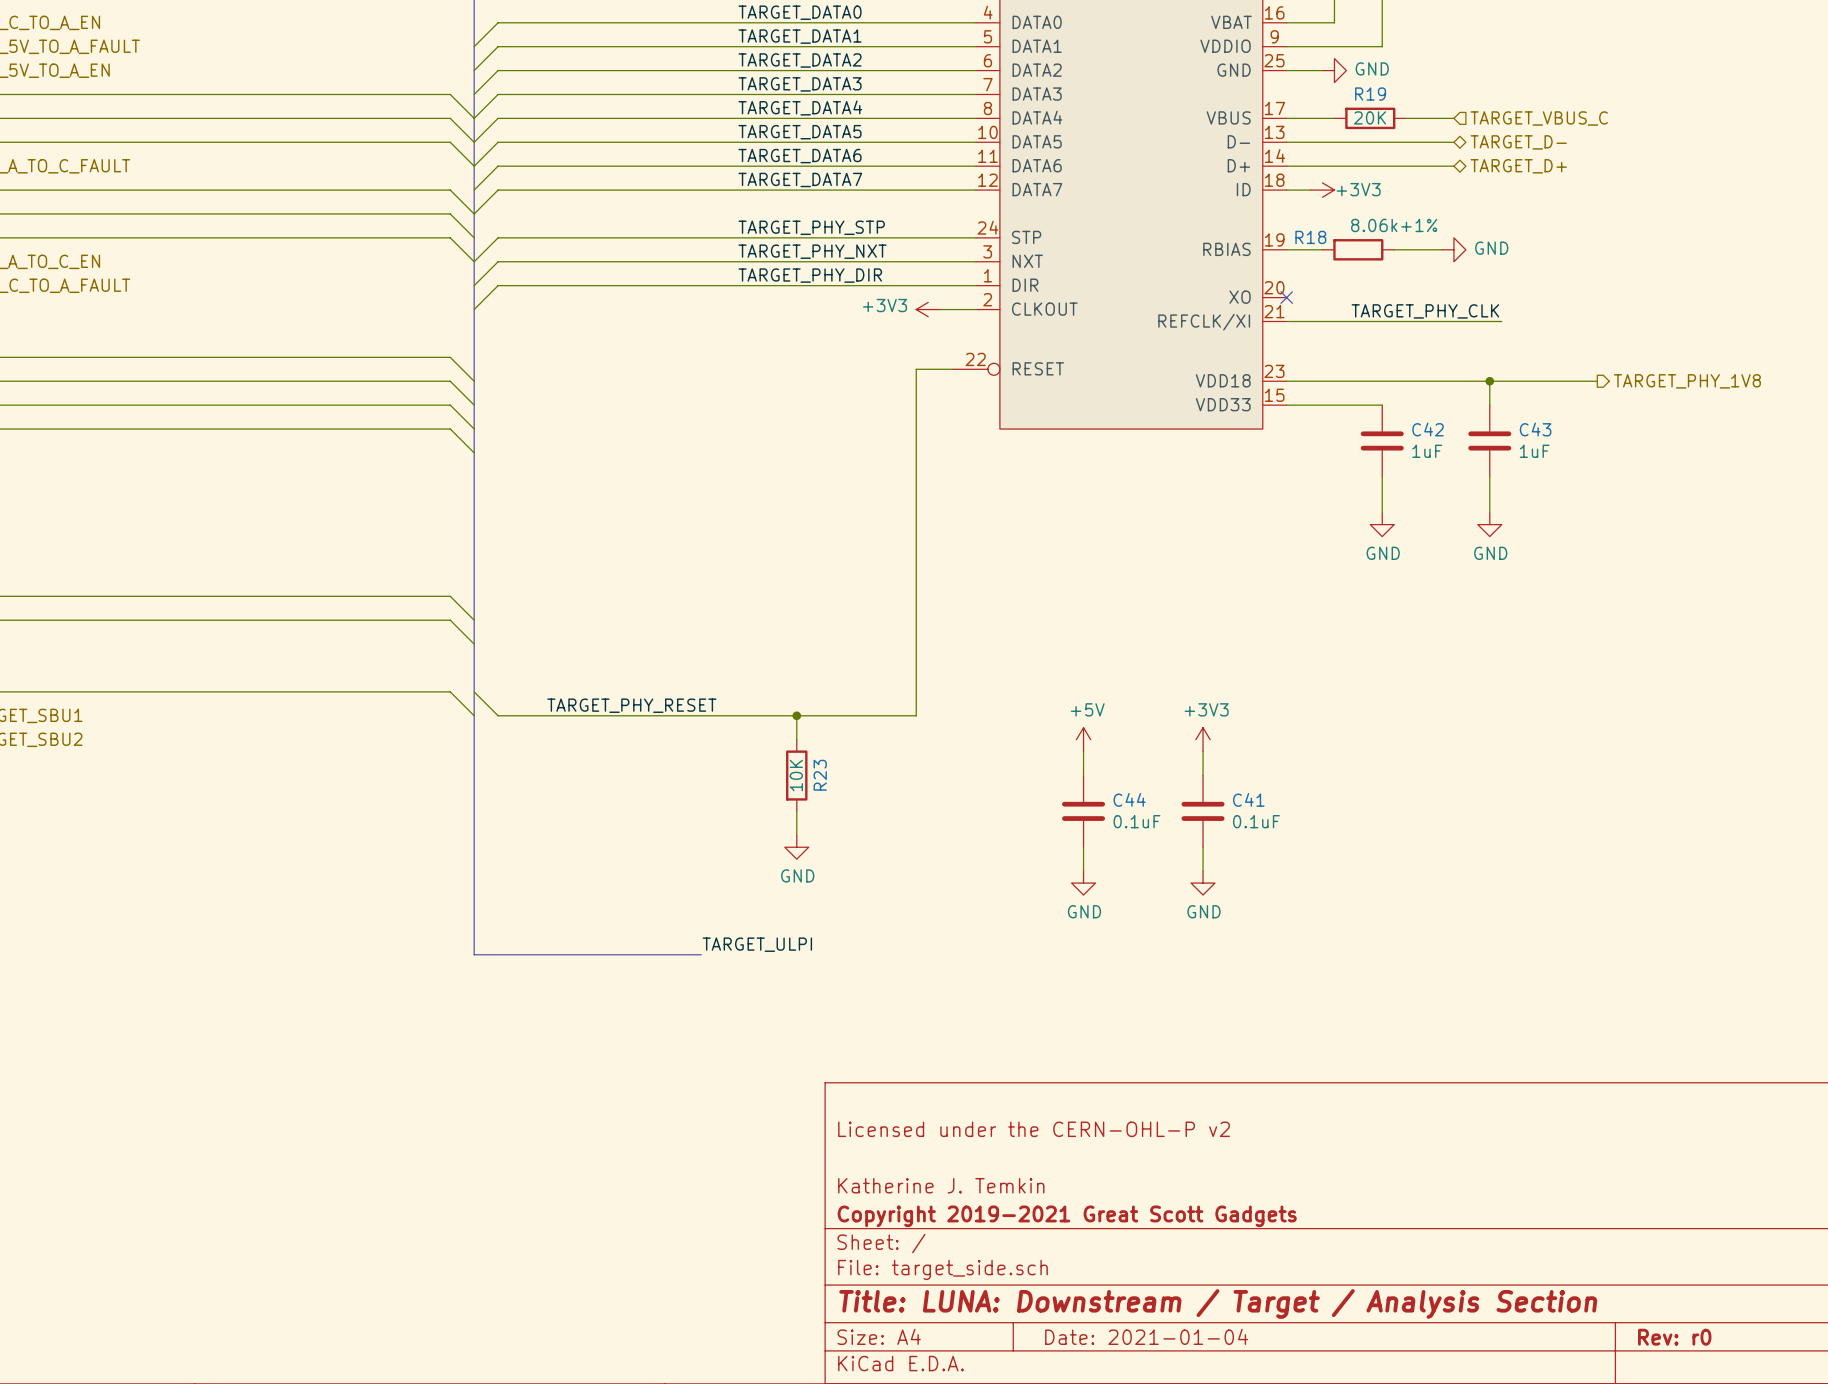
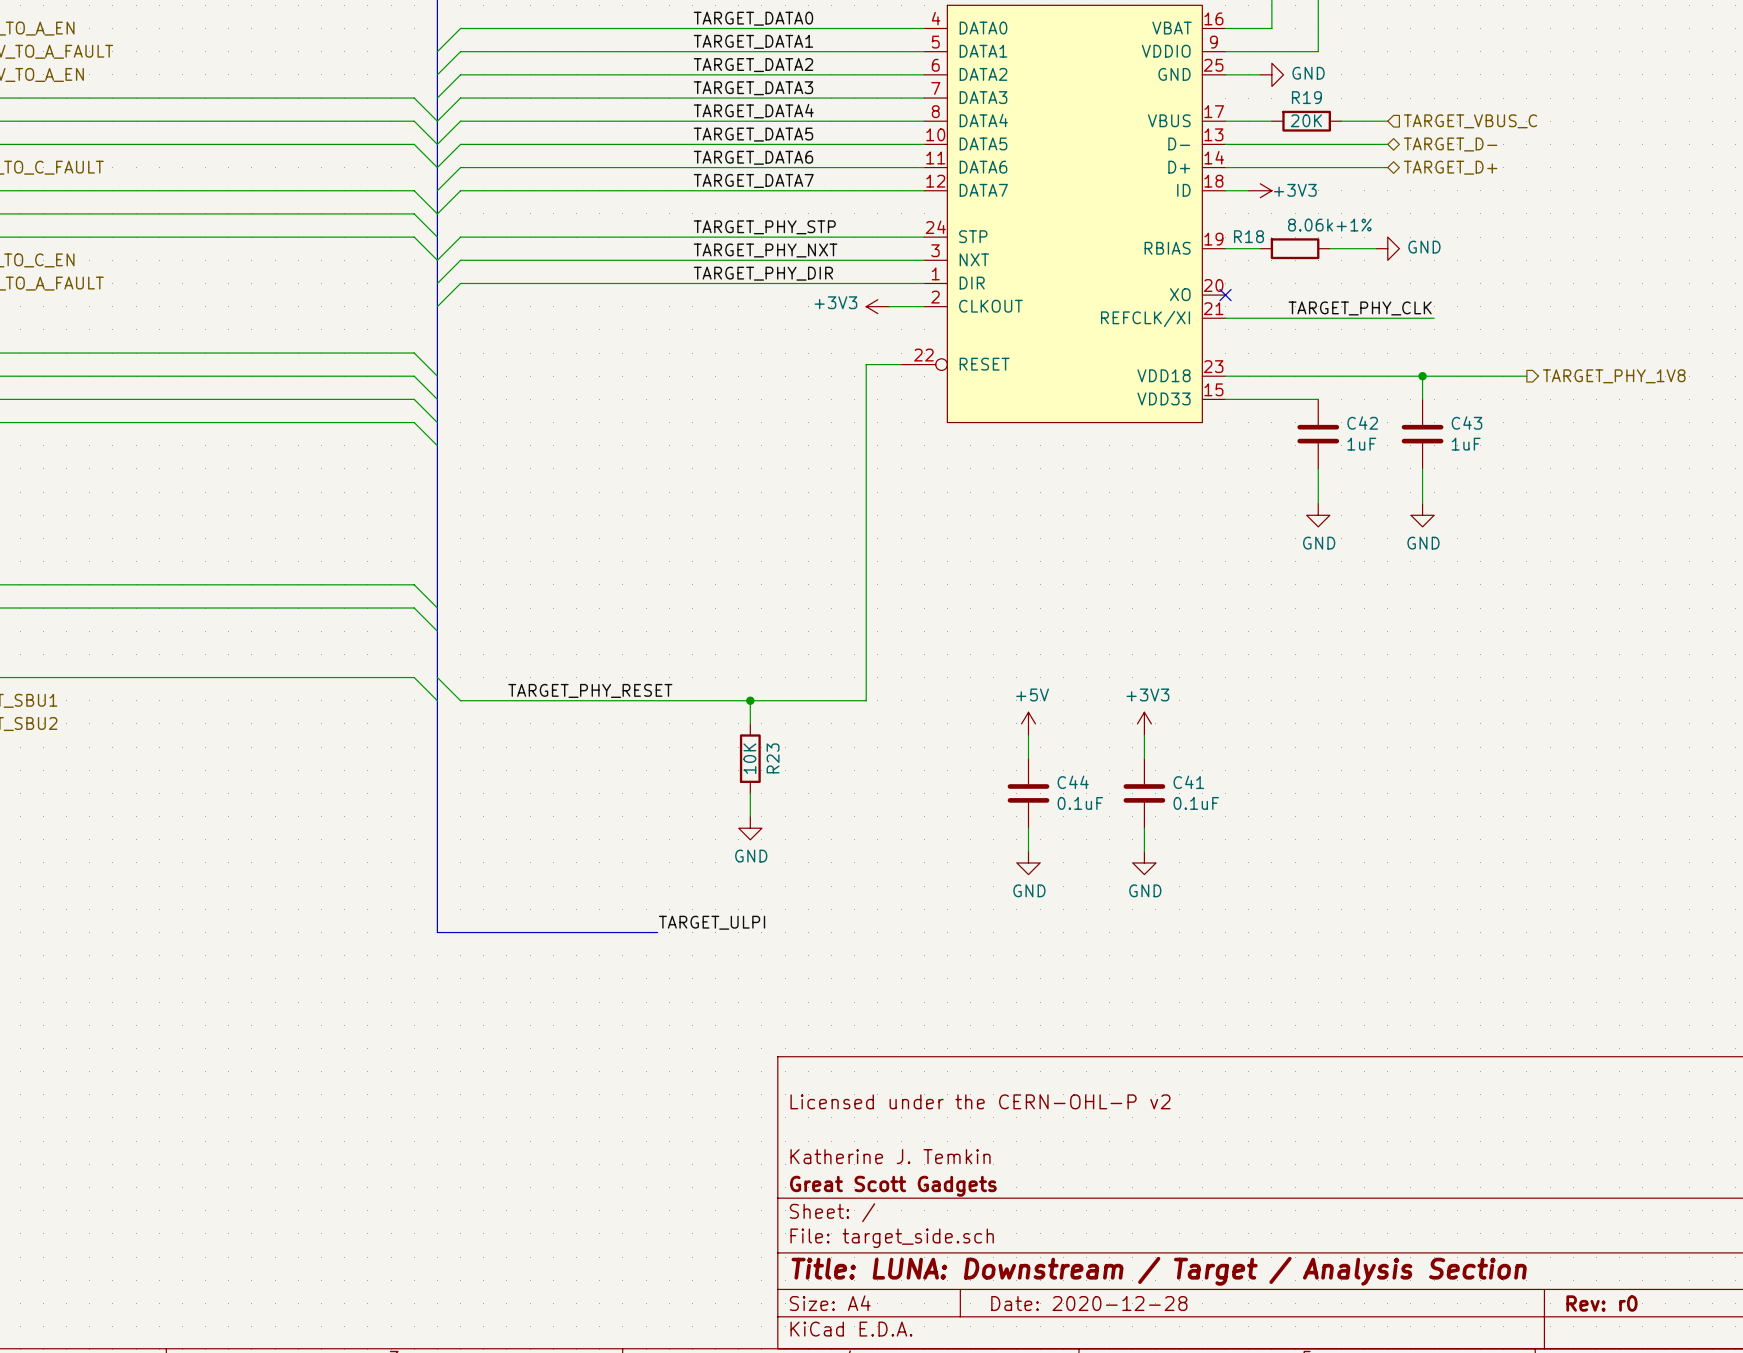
title block: Copyright 2019-2021 Great Scott Gadgets (1067, 1216) -> Great Scott Gadgets (893, 1186)
title block: Date: 2021-01-04 (1146, 1336) -> Date: 2020-12-28 (1089, 1303)

